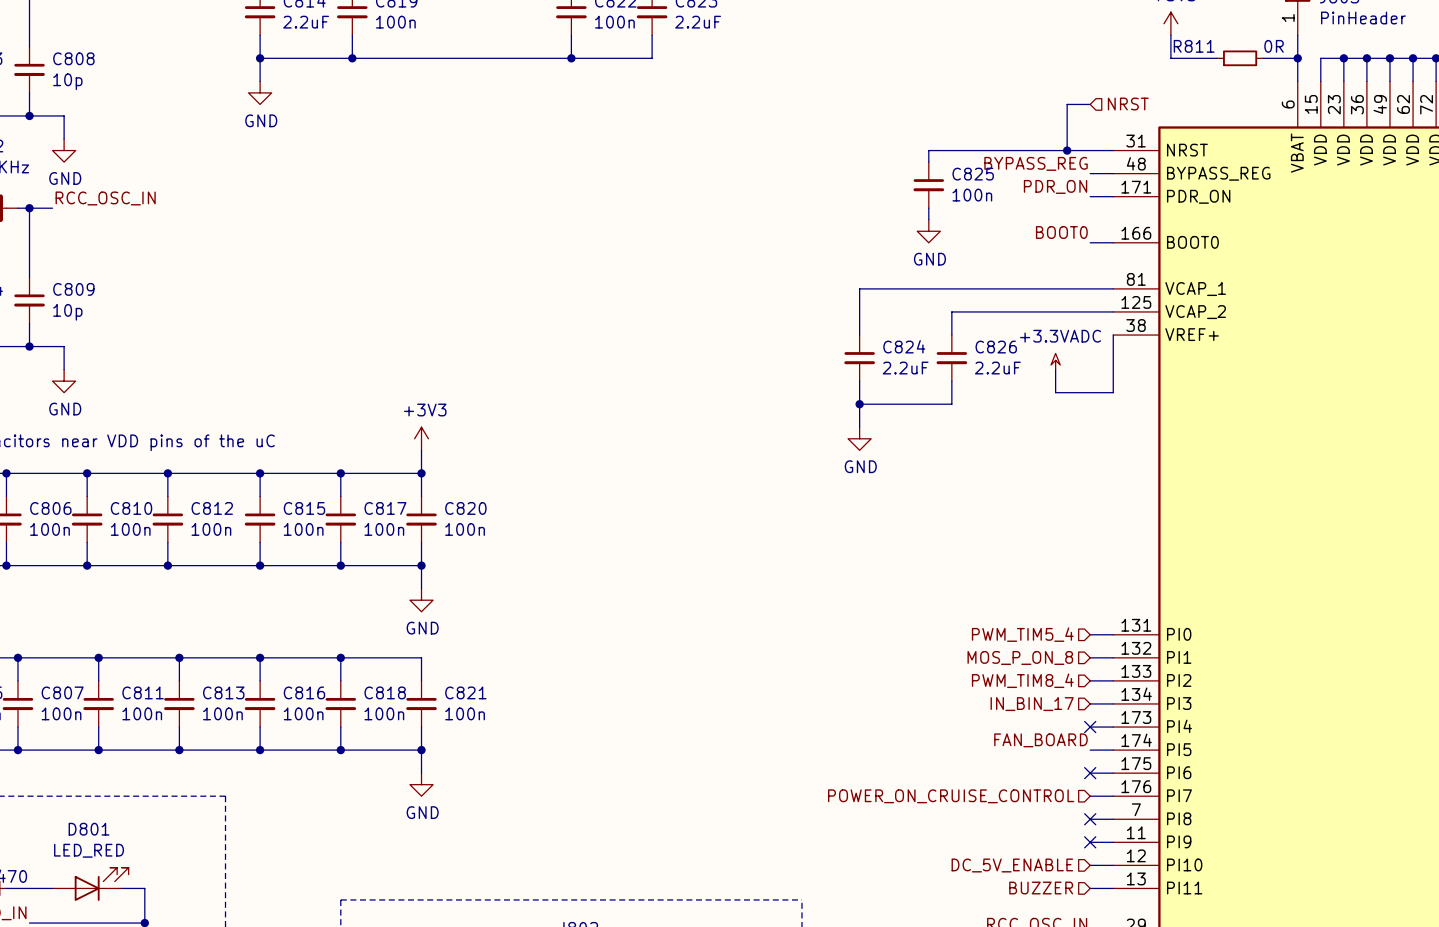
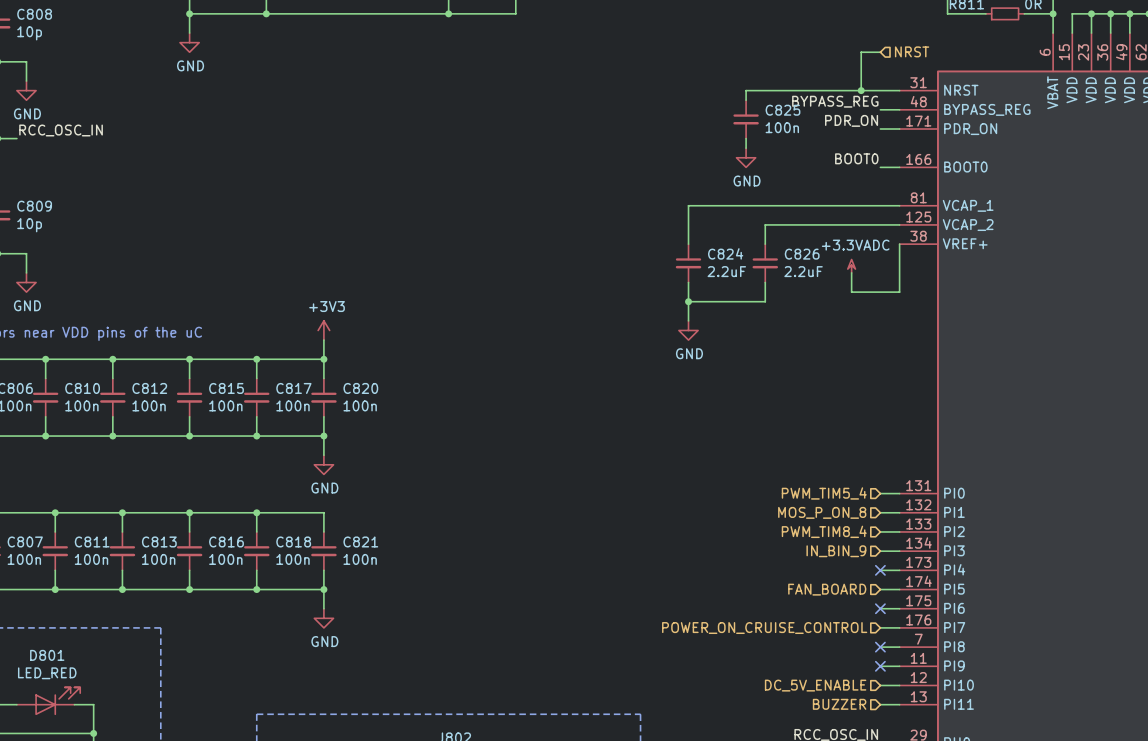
hierarchical label: IN_BIN_17 (1032, 704) -> IN_BIN_9 (836, 551)
label: FAN_BOARD (1040, 740) -> none
hierarchical label: none -> FAN_BOARD (827, 589)

